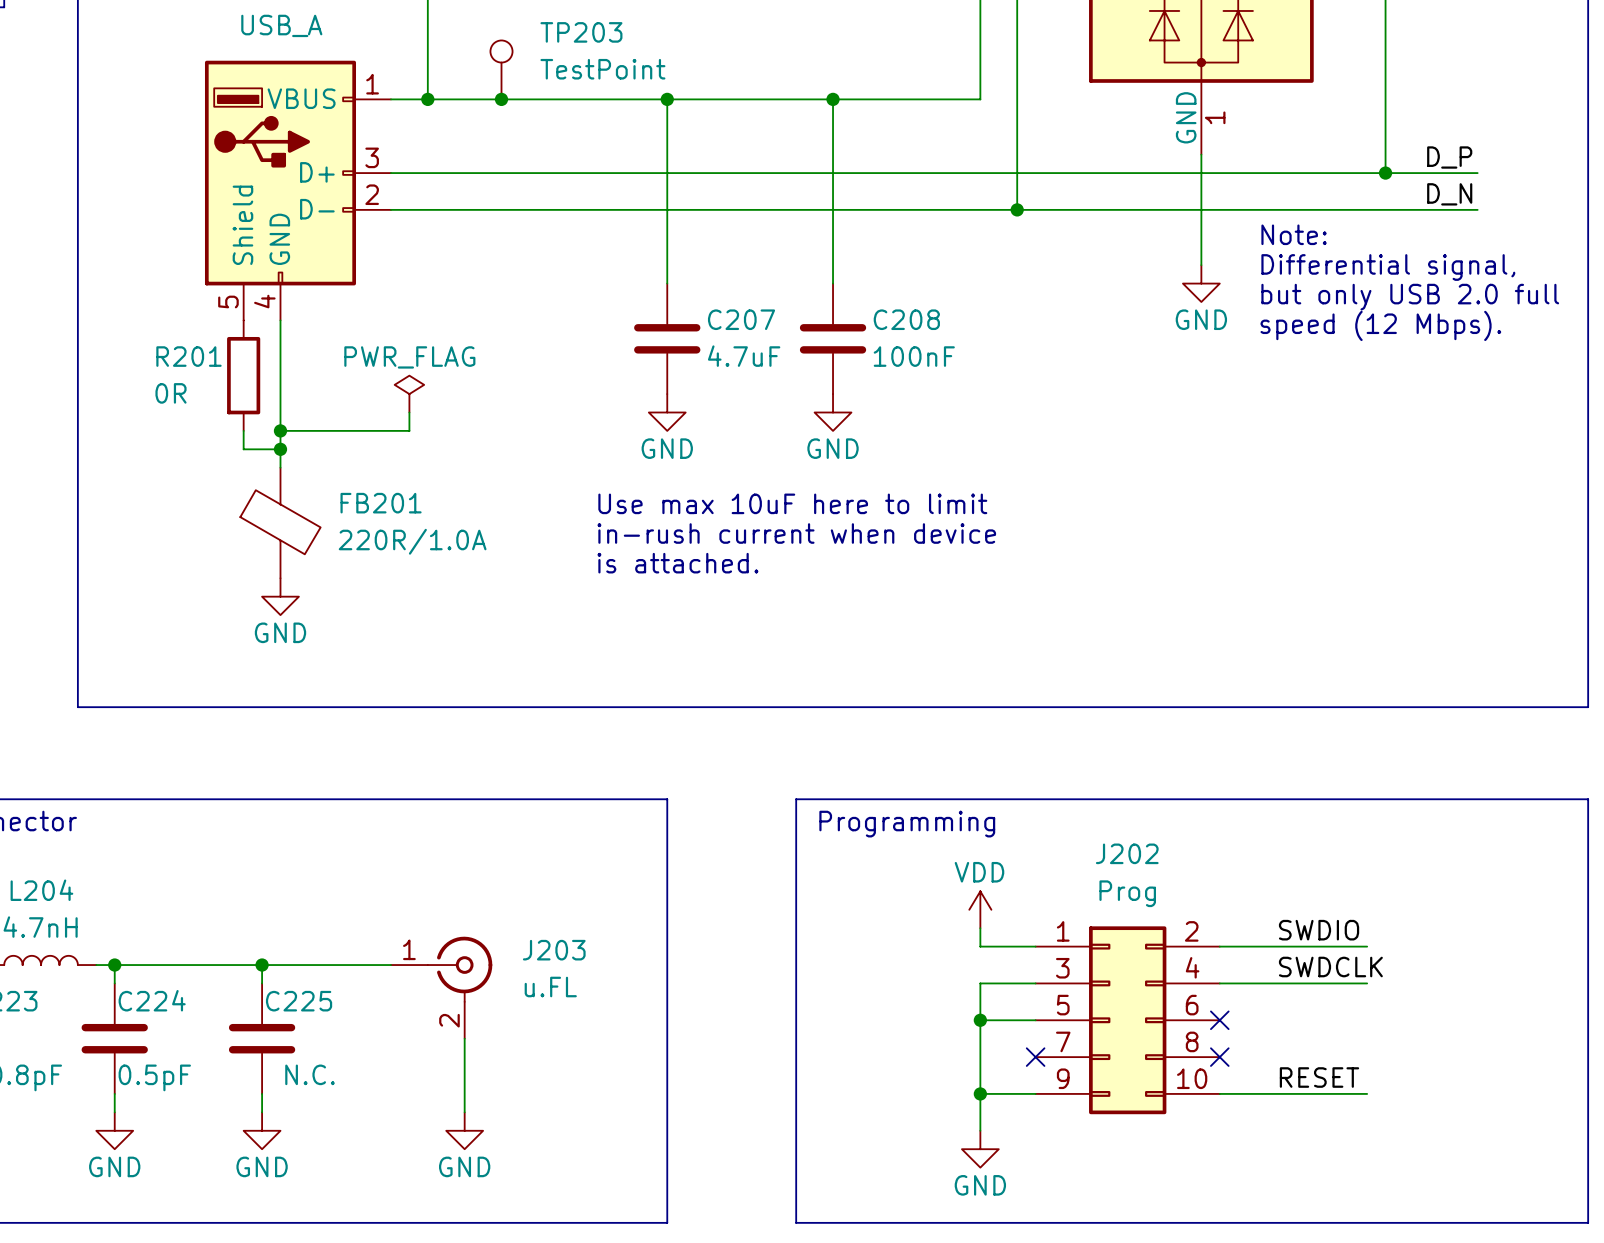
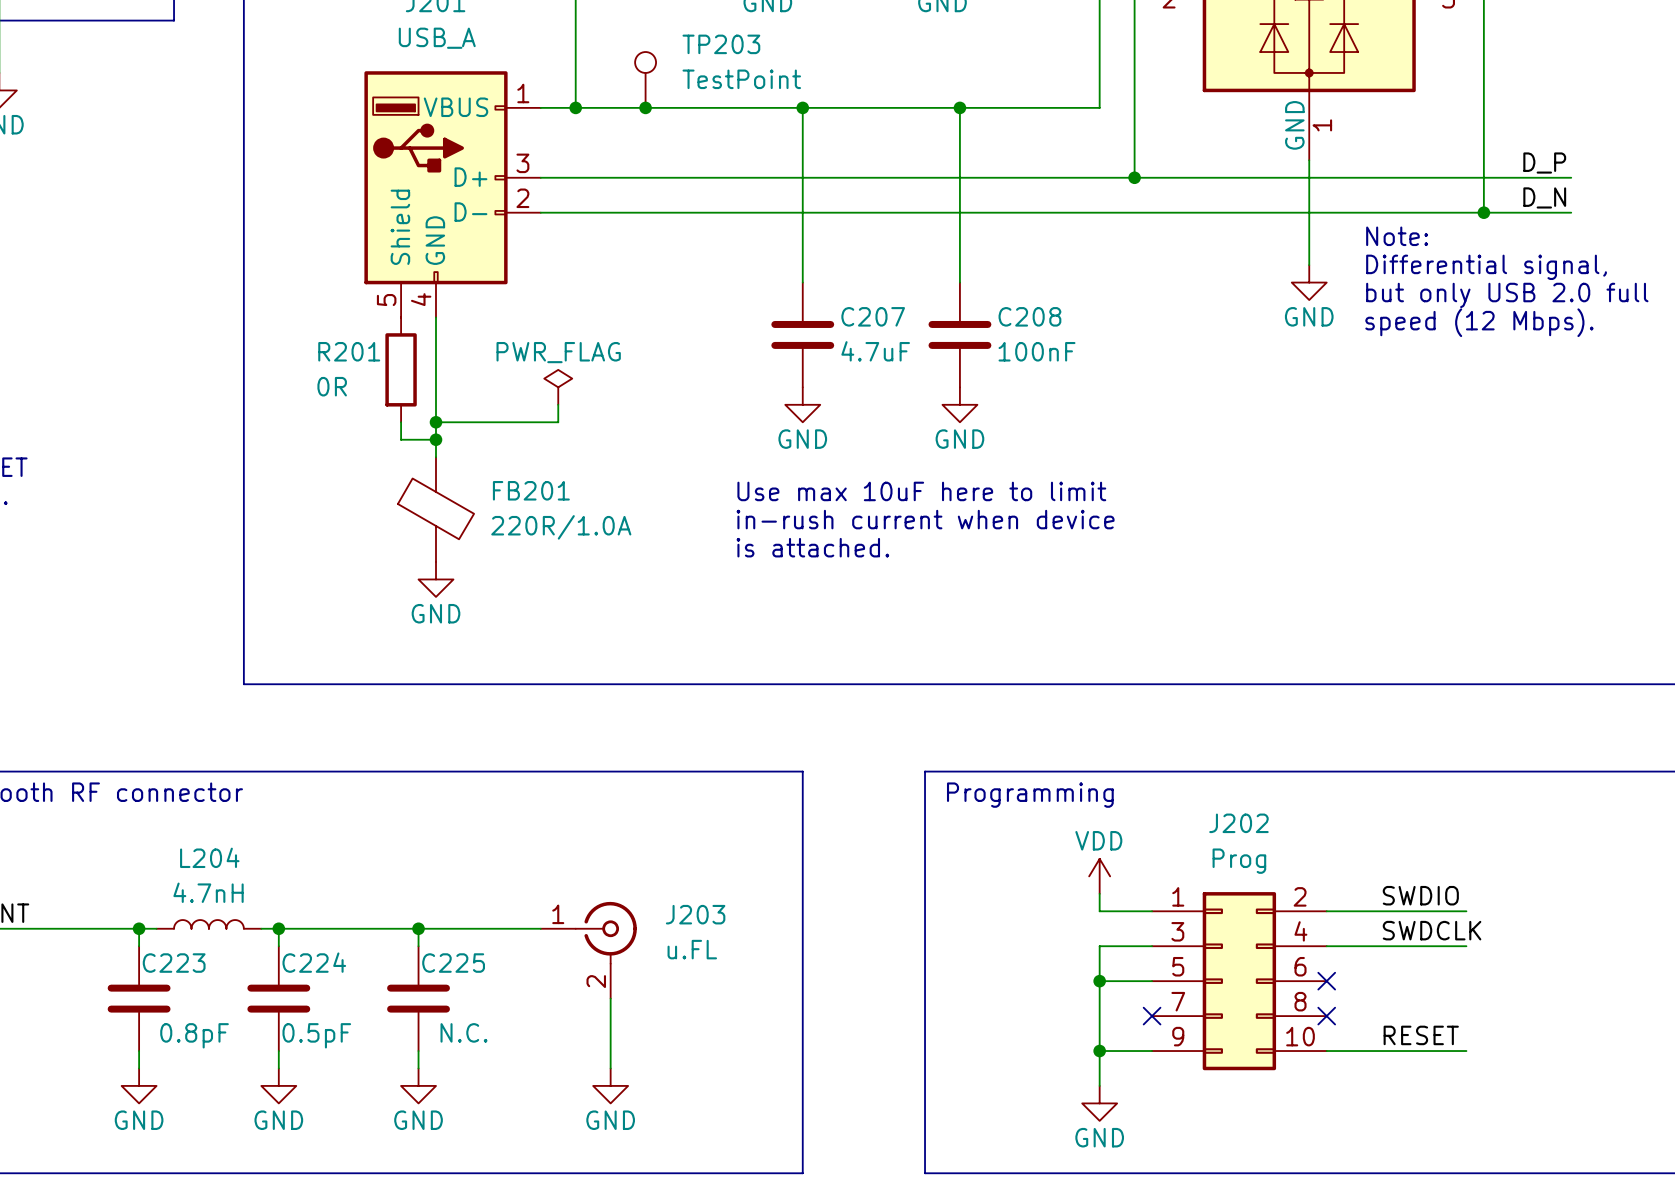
wire: (1017, 173) (1017, 209) -> none
wire: none -> (1483, 177) (1483, 212)
junction position: (1385, 173) -> (1483, 212)
junction position: (1017, 209) -> (1134, 177)

